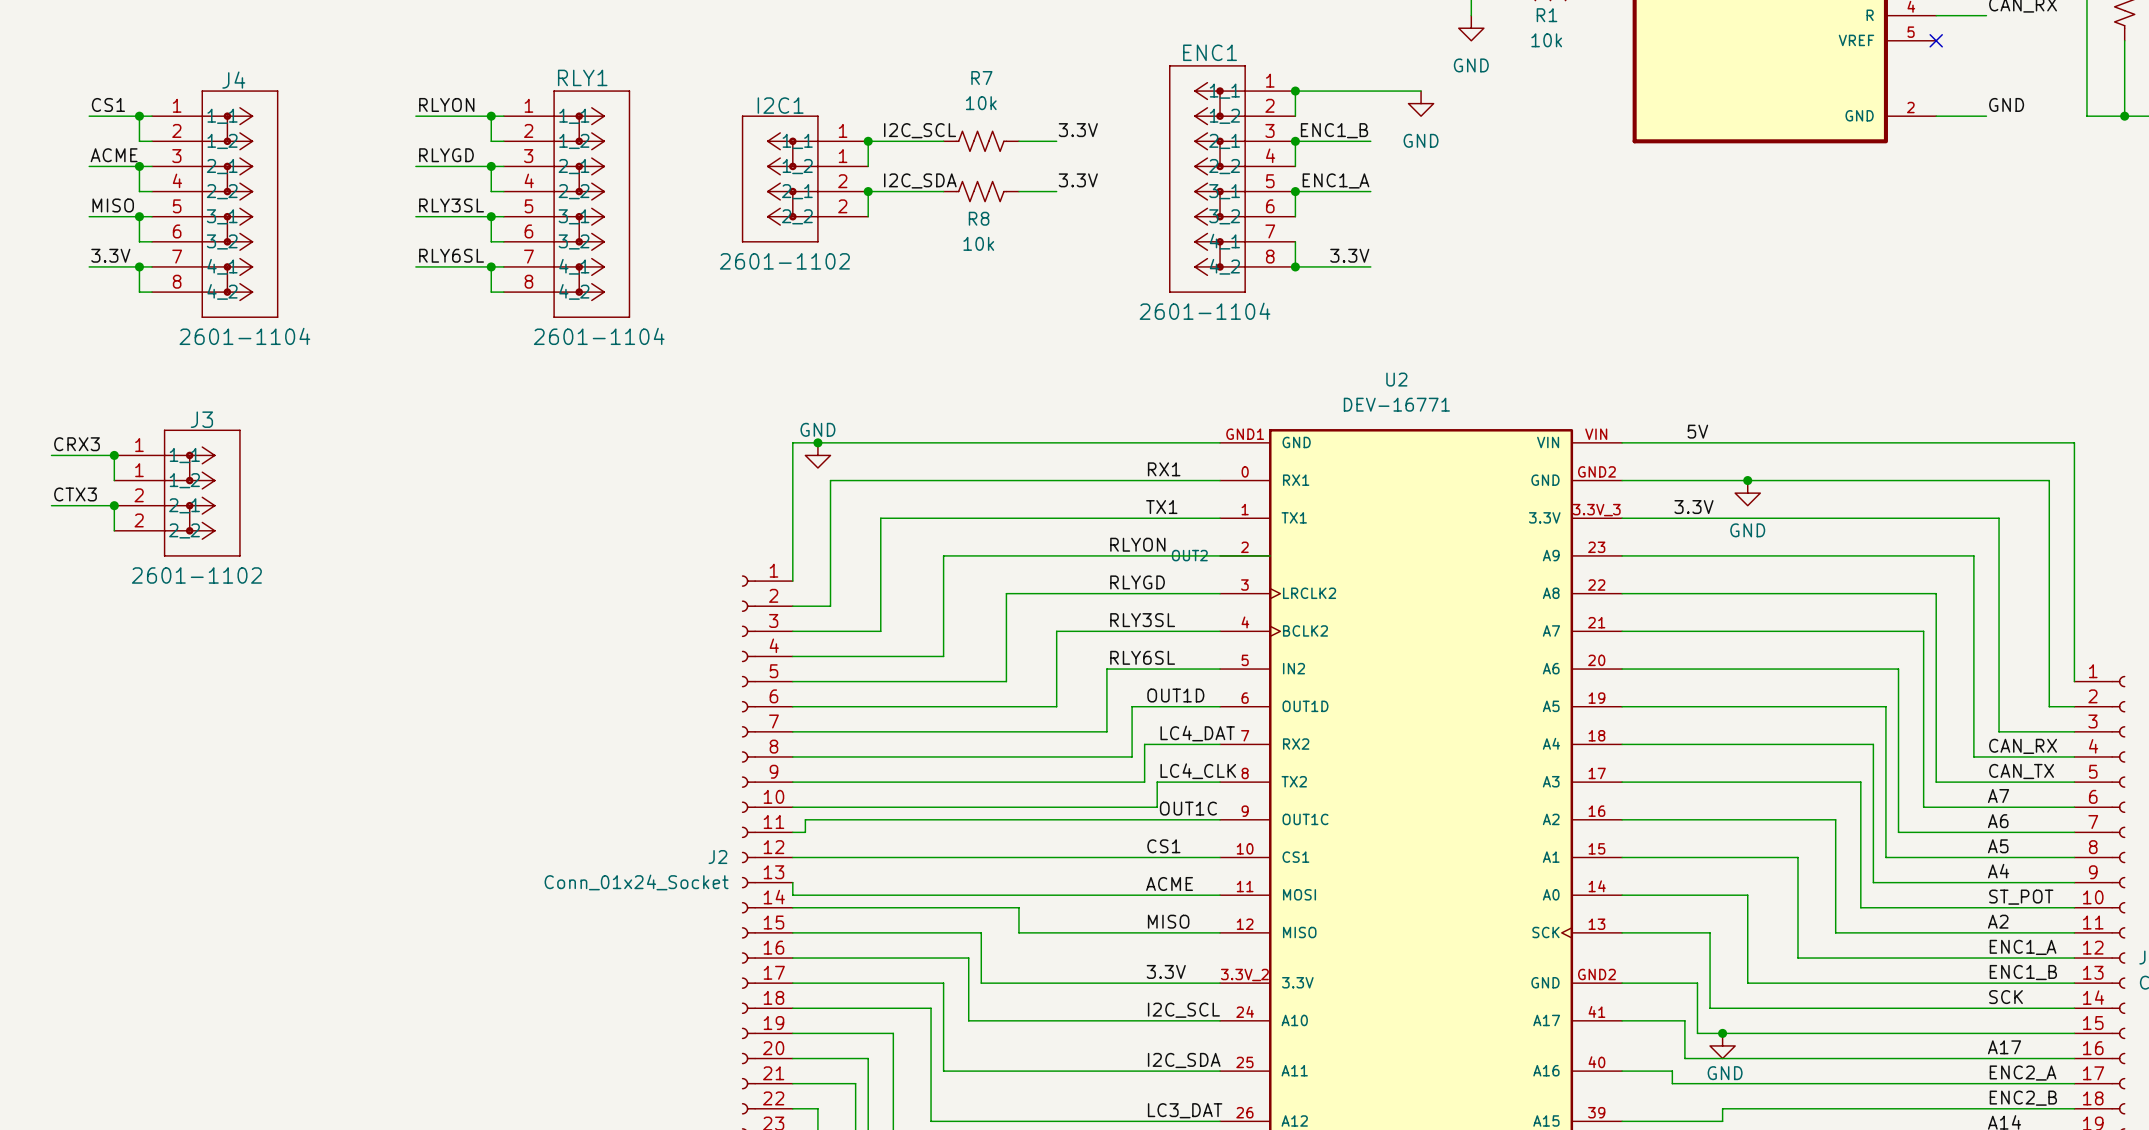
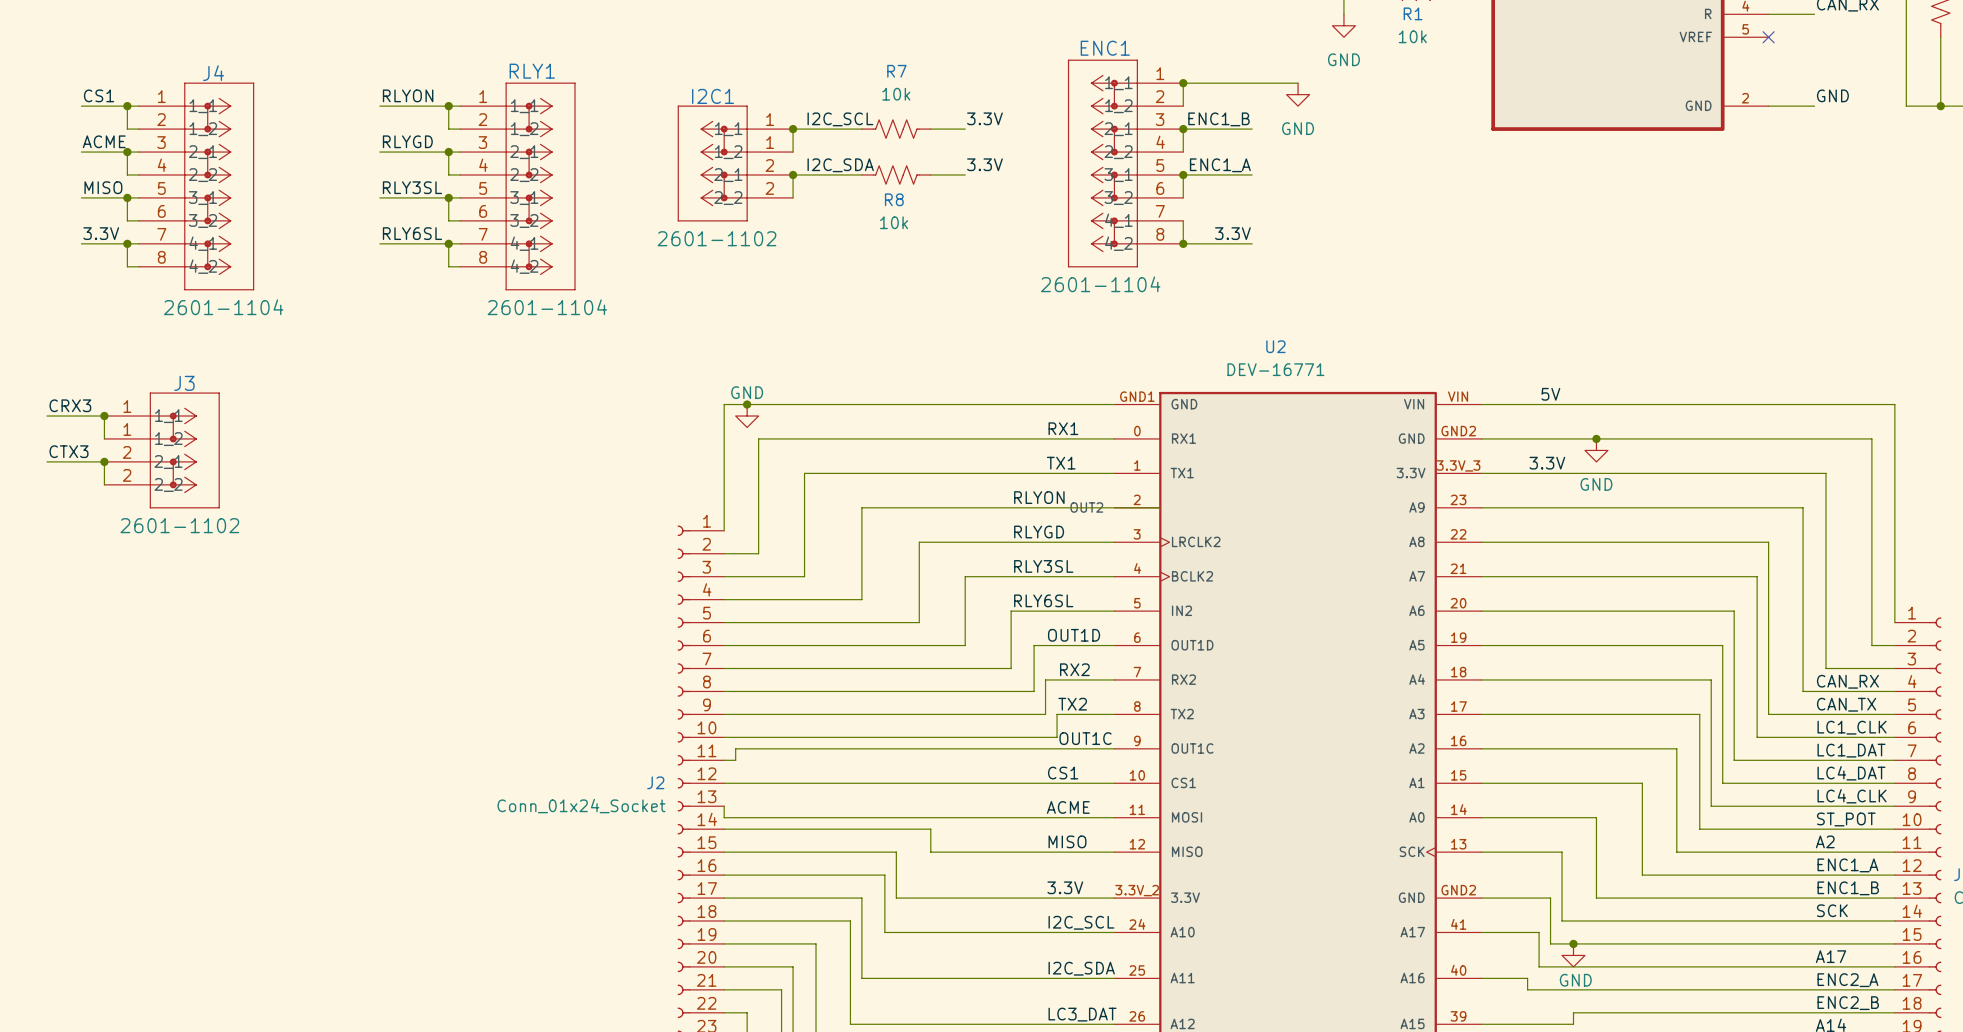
label: LC4_DAT (1197, 733) -> RX2 (1074, 669)
label: LC4_CLK (1198, 771) -> TX2 (1072, 704)
label: A7 (1998, 796) -> LC1_CLK (1852, 727)
label: A6 (1998, 821) -> LC1_DAT (1851, 750)
label: A5 (1998, 846) -> LC4_DAT (1851, 773)
label: A4 (1998, 871) -> LC4_CLK (1852, 796)

